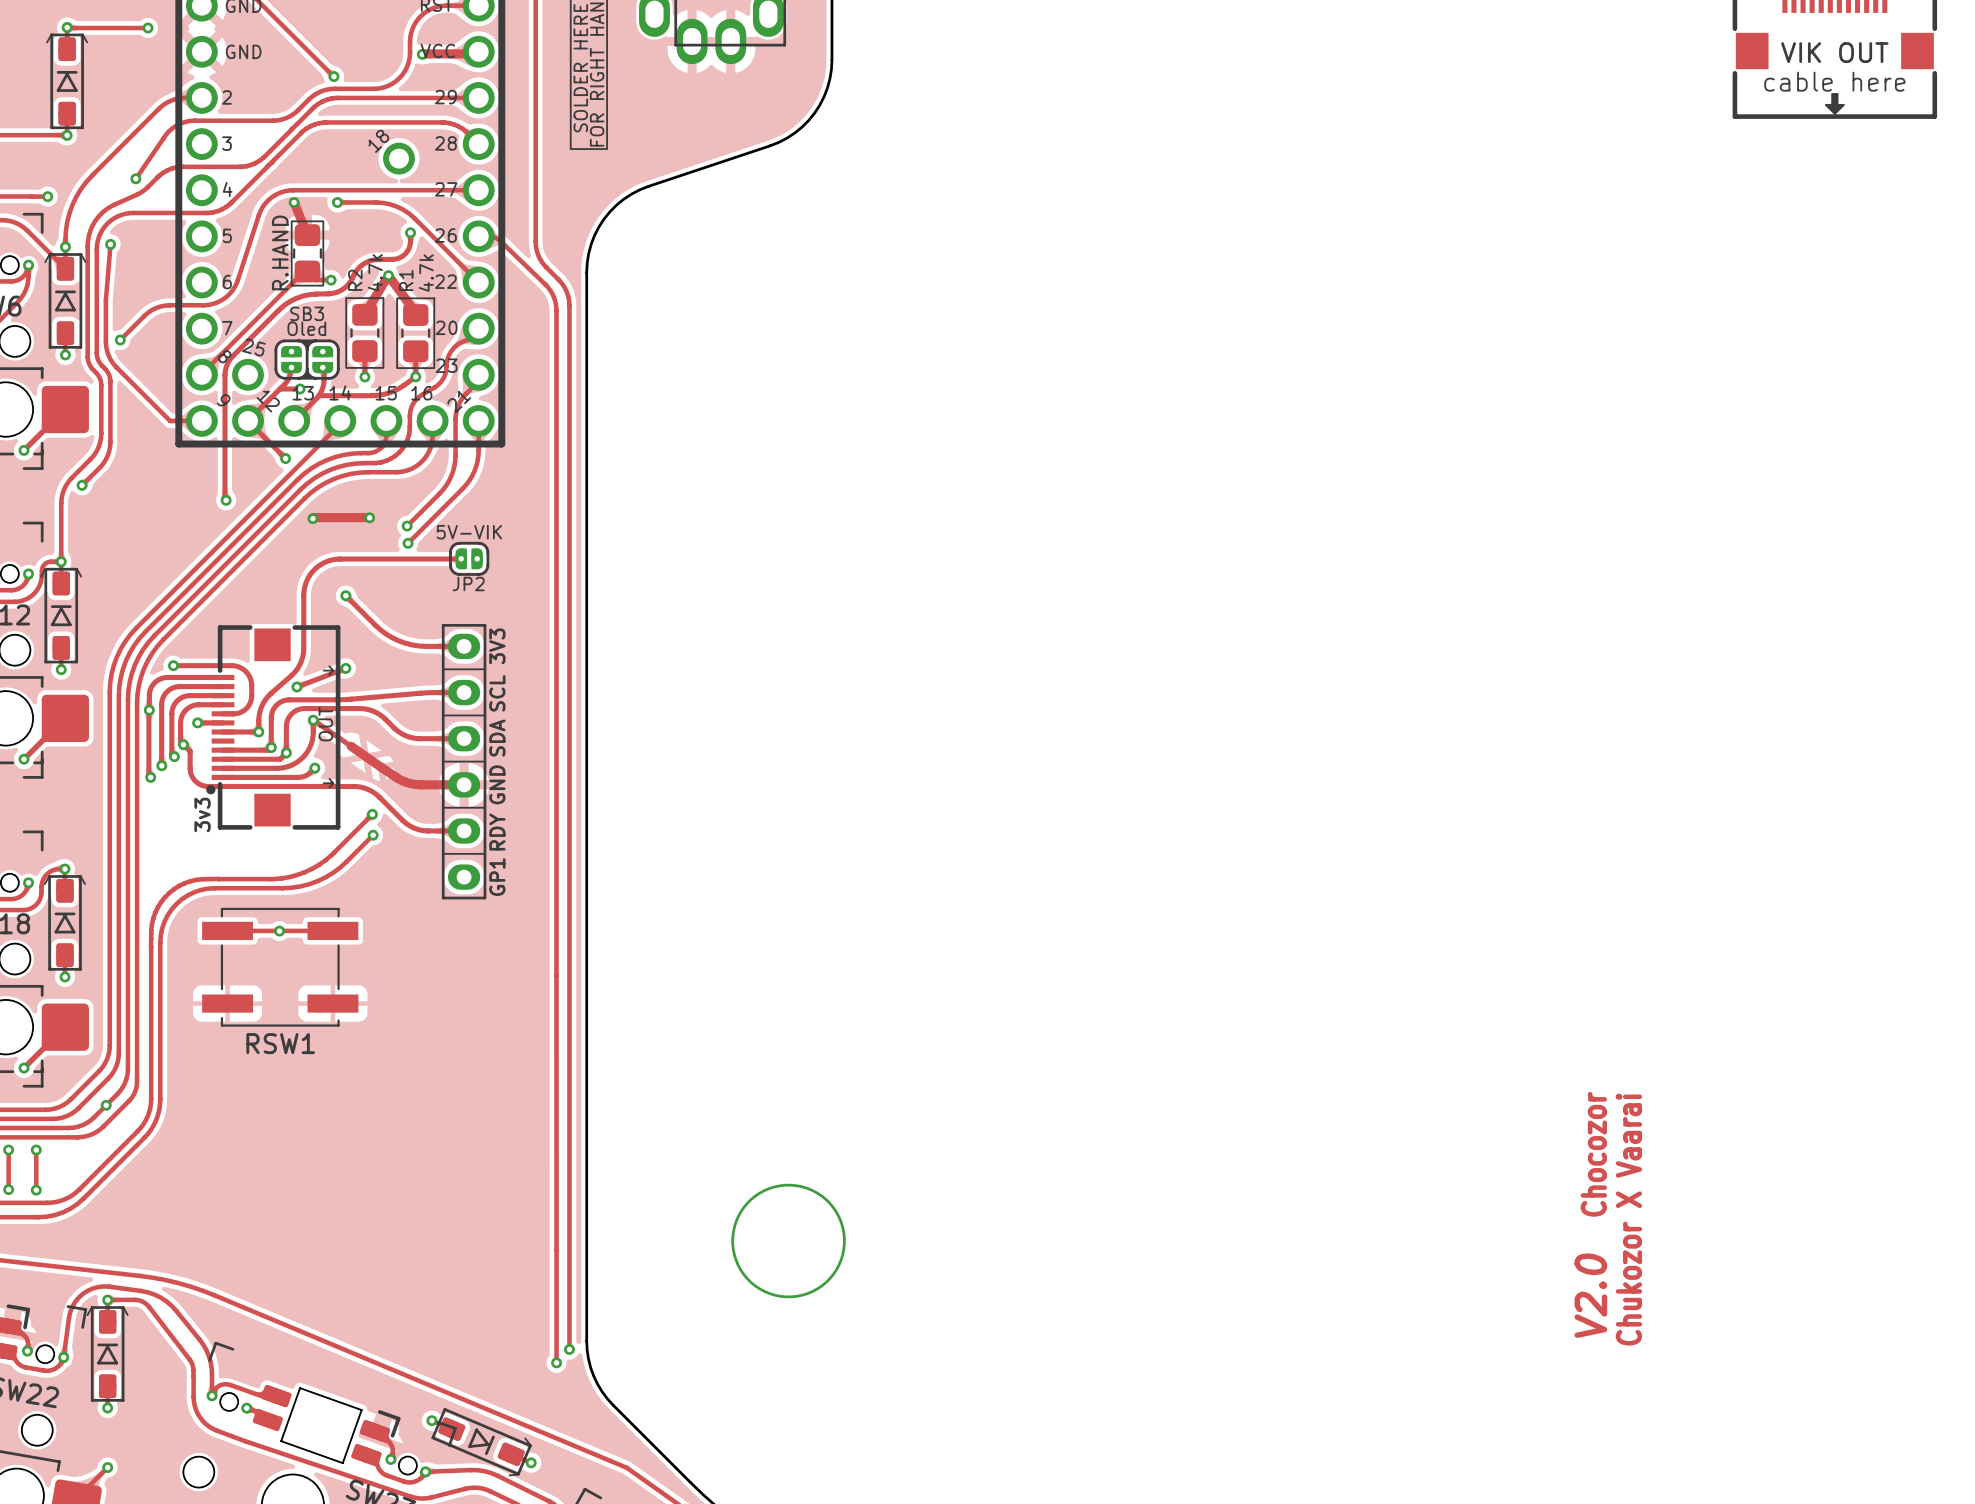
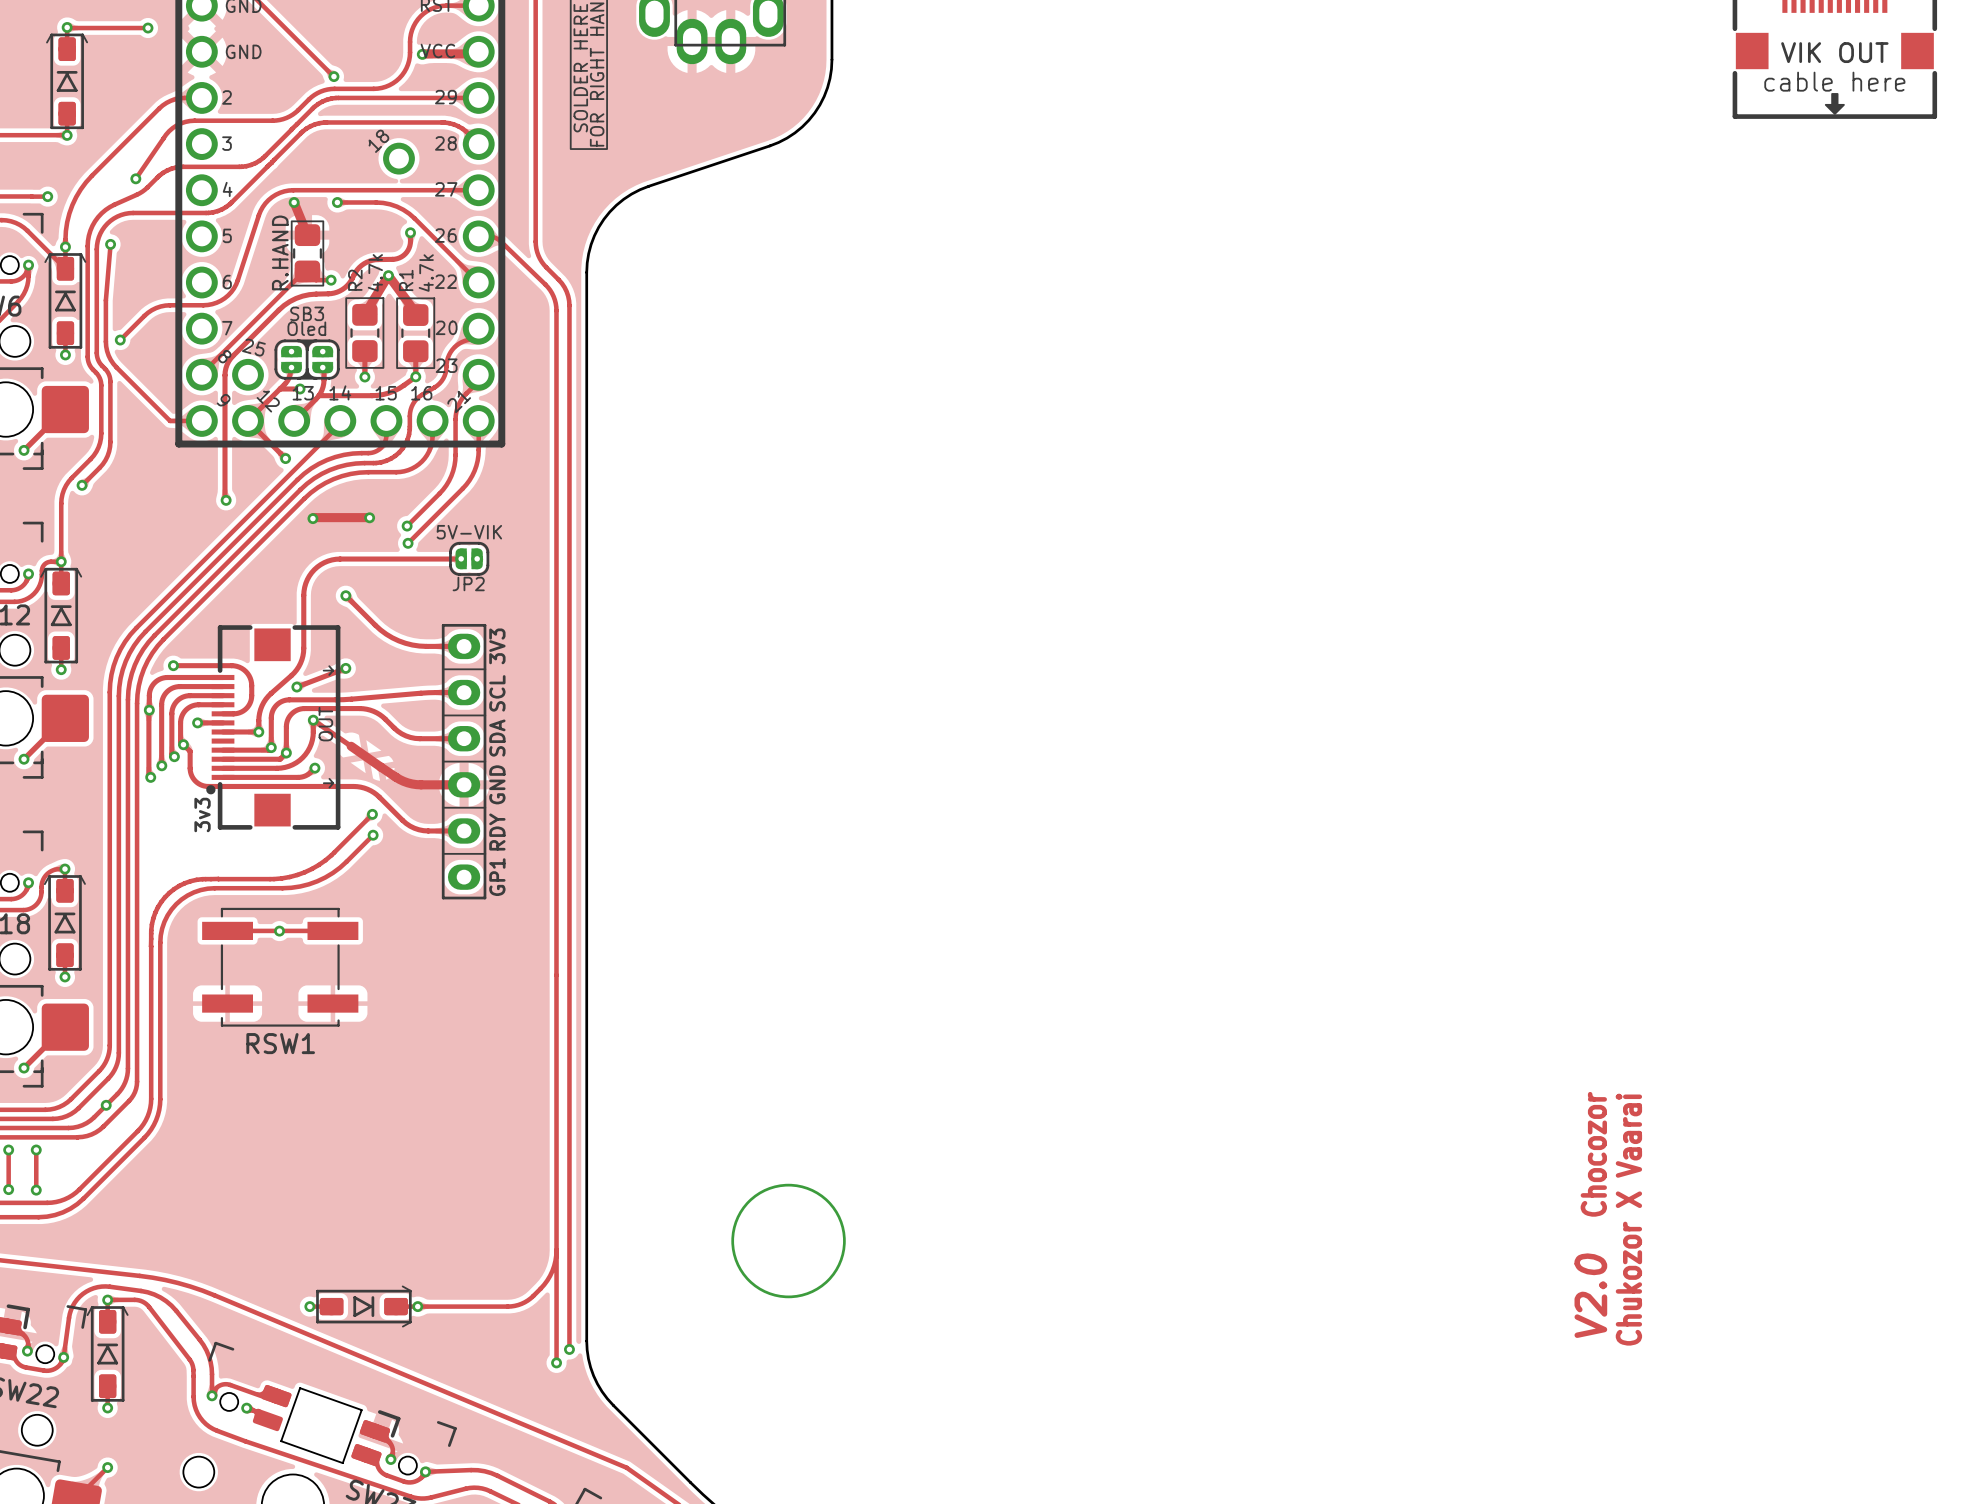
track: none -> (556, 1250) (554, 1266) (547, 1280) (530, 1298) (521, 1303) (507, 1306) (417, 1306)
part: none -> (363, 1306)
part: (481, 1442) -> none

